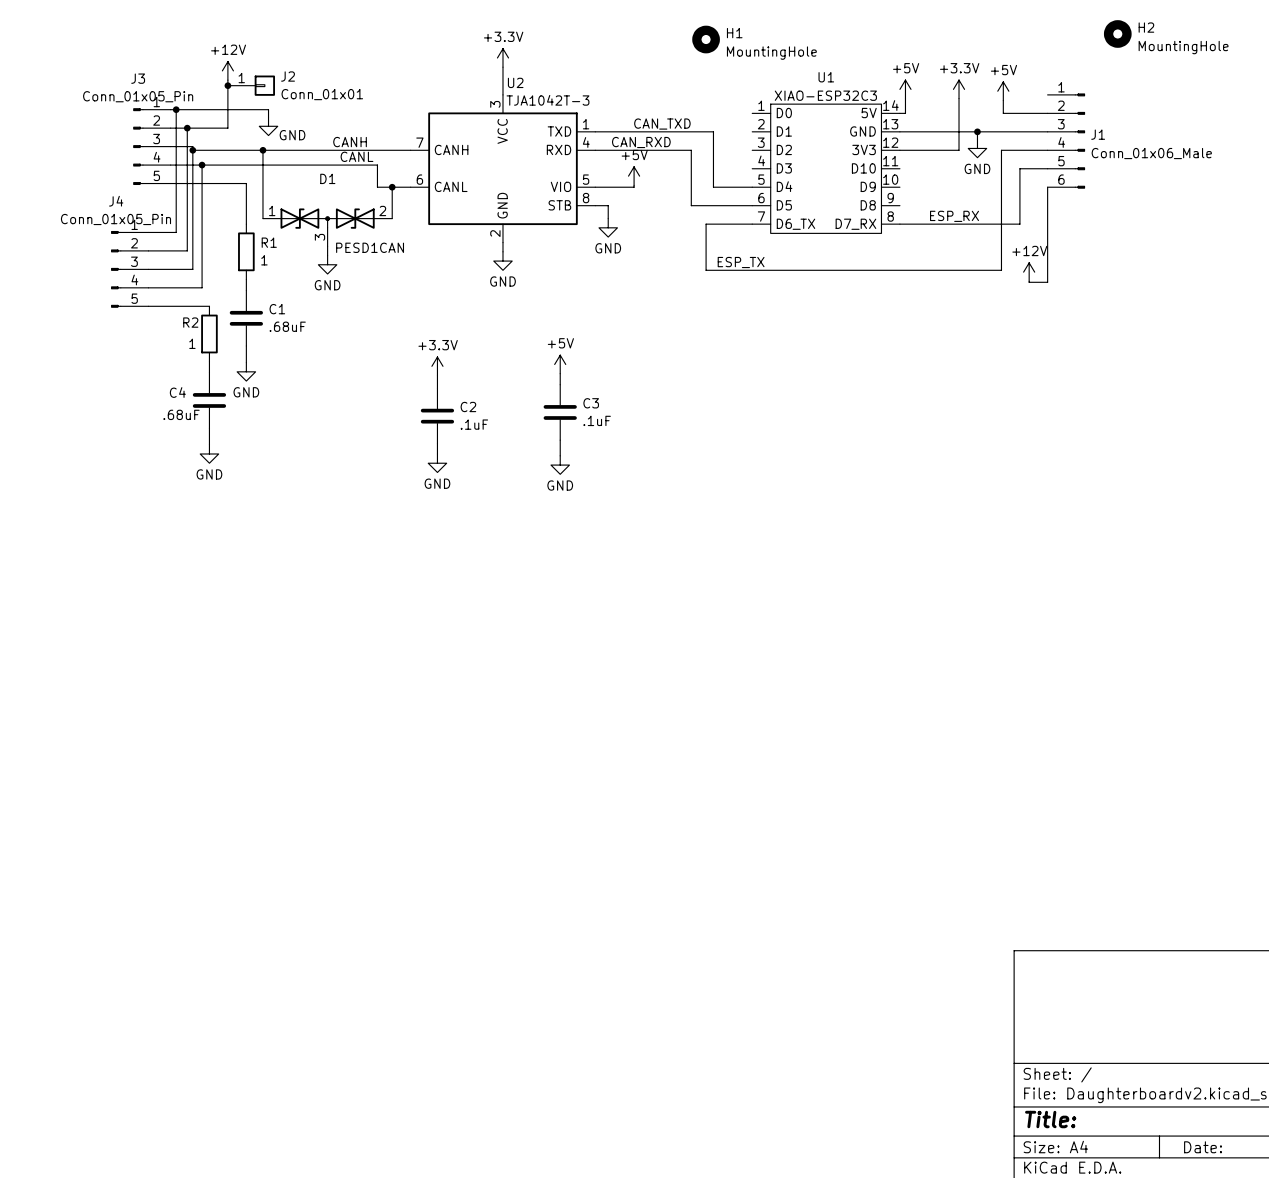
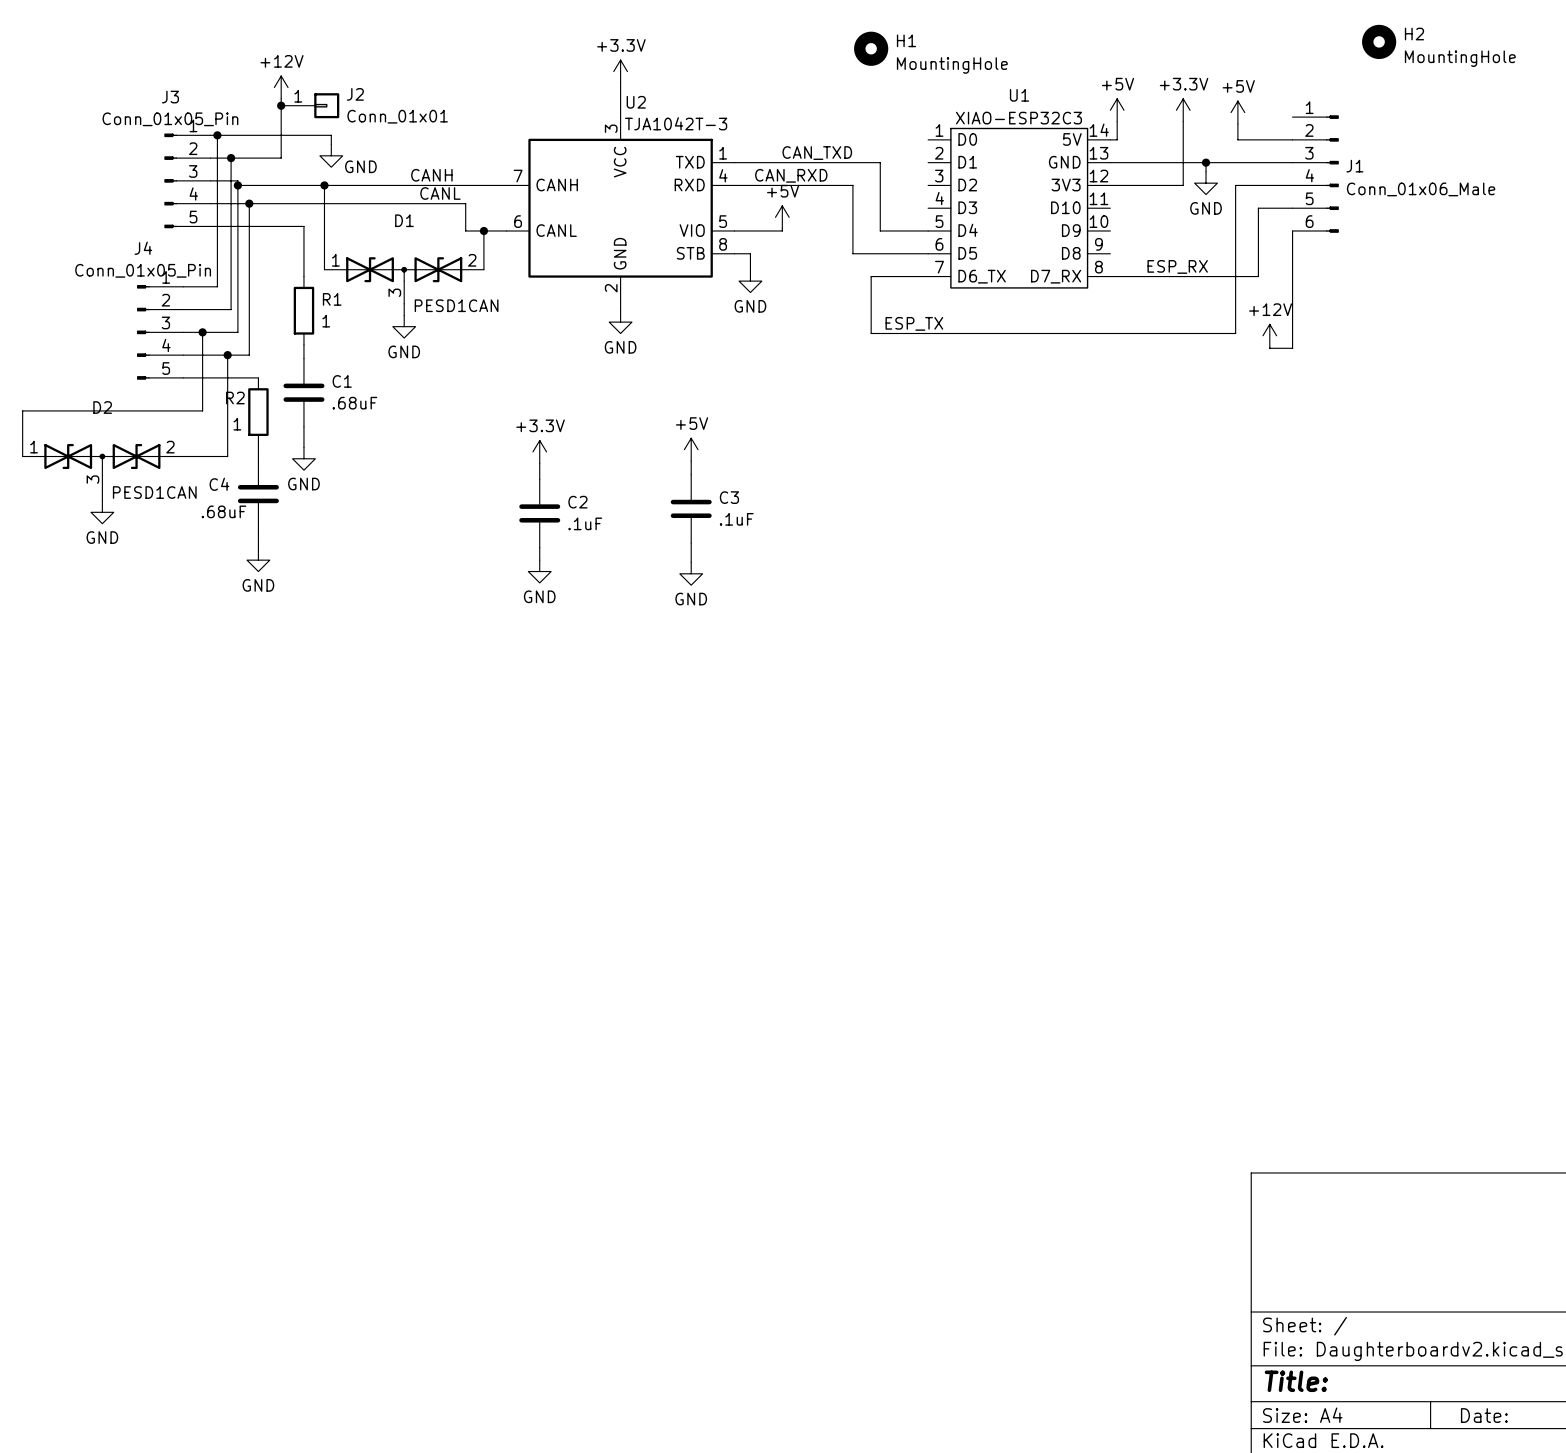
wire: none -> (202, 332) (202, 410) (22, 410) (22, 456)
junction: none -> (202, 332)
wire: none -> (227, 355) (227, 456) (182, 456)
junction: none -> (227, 355)
D2: none -> PESD1CAN (102, 467)
wire: none -> (102, 490) (102, 500)
power symbol: none -> GND (102, 512)

